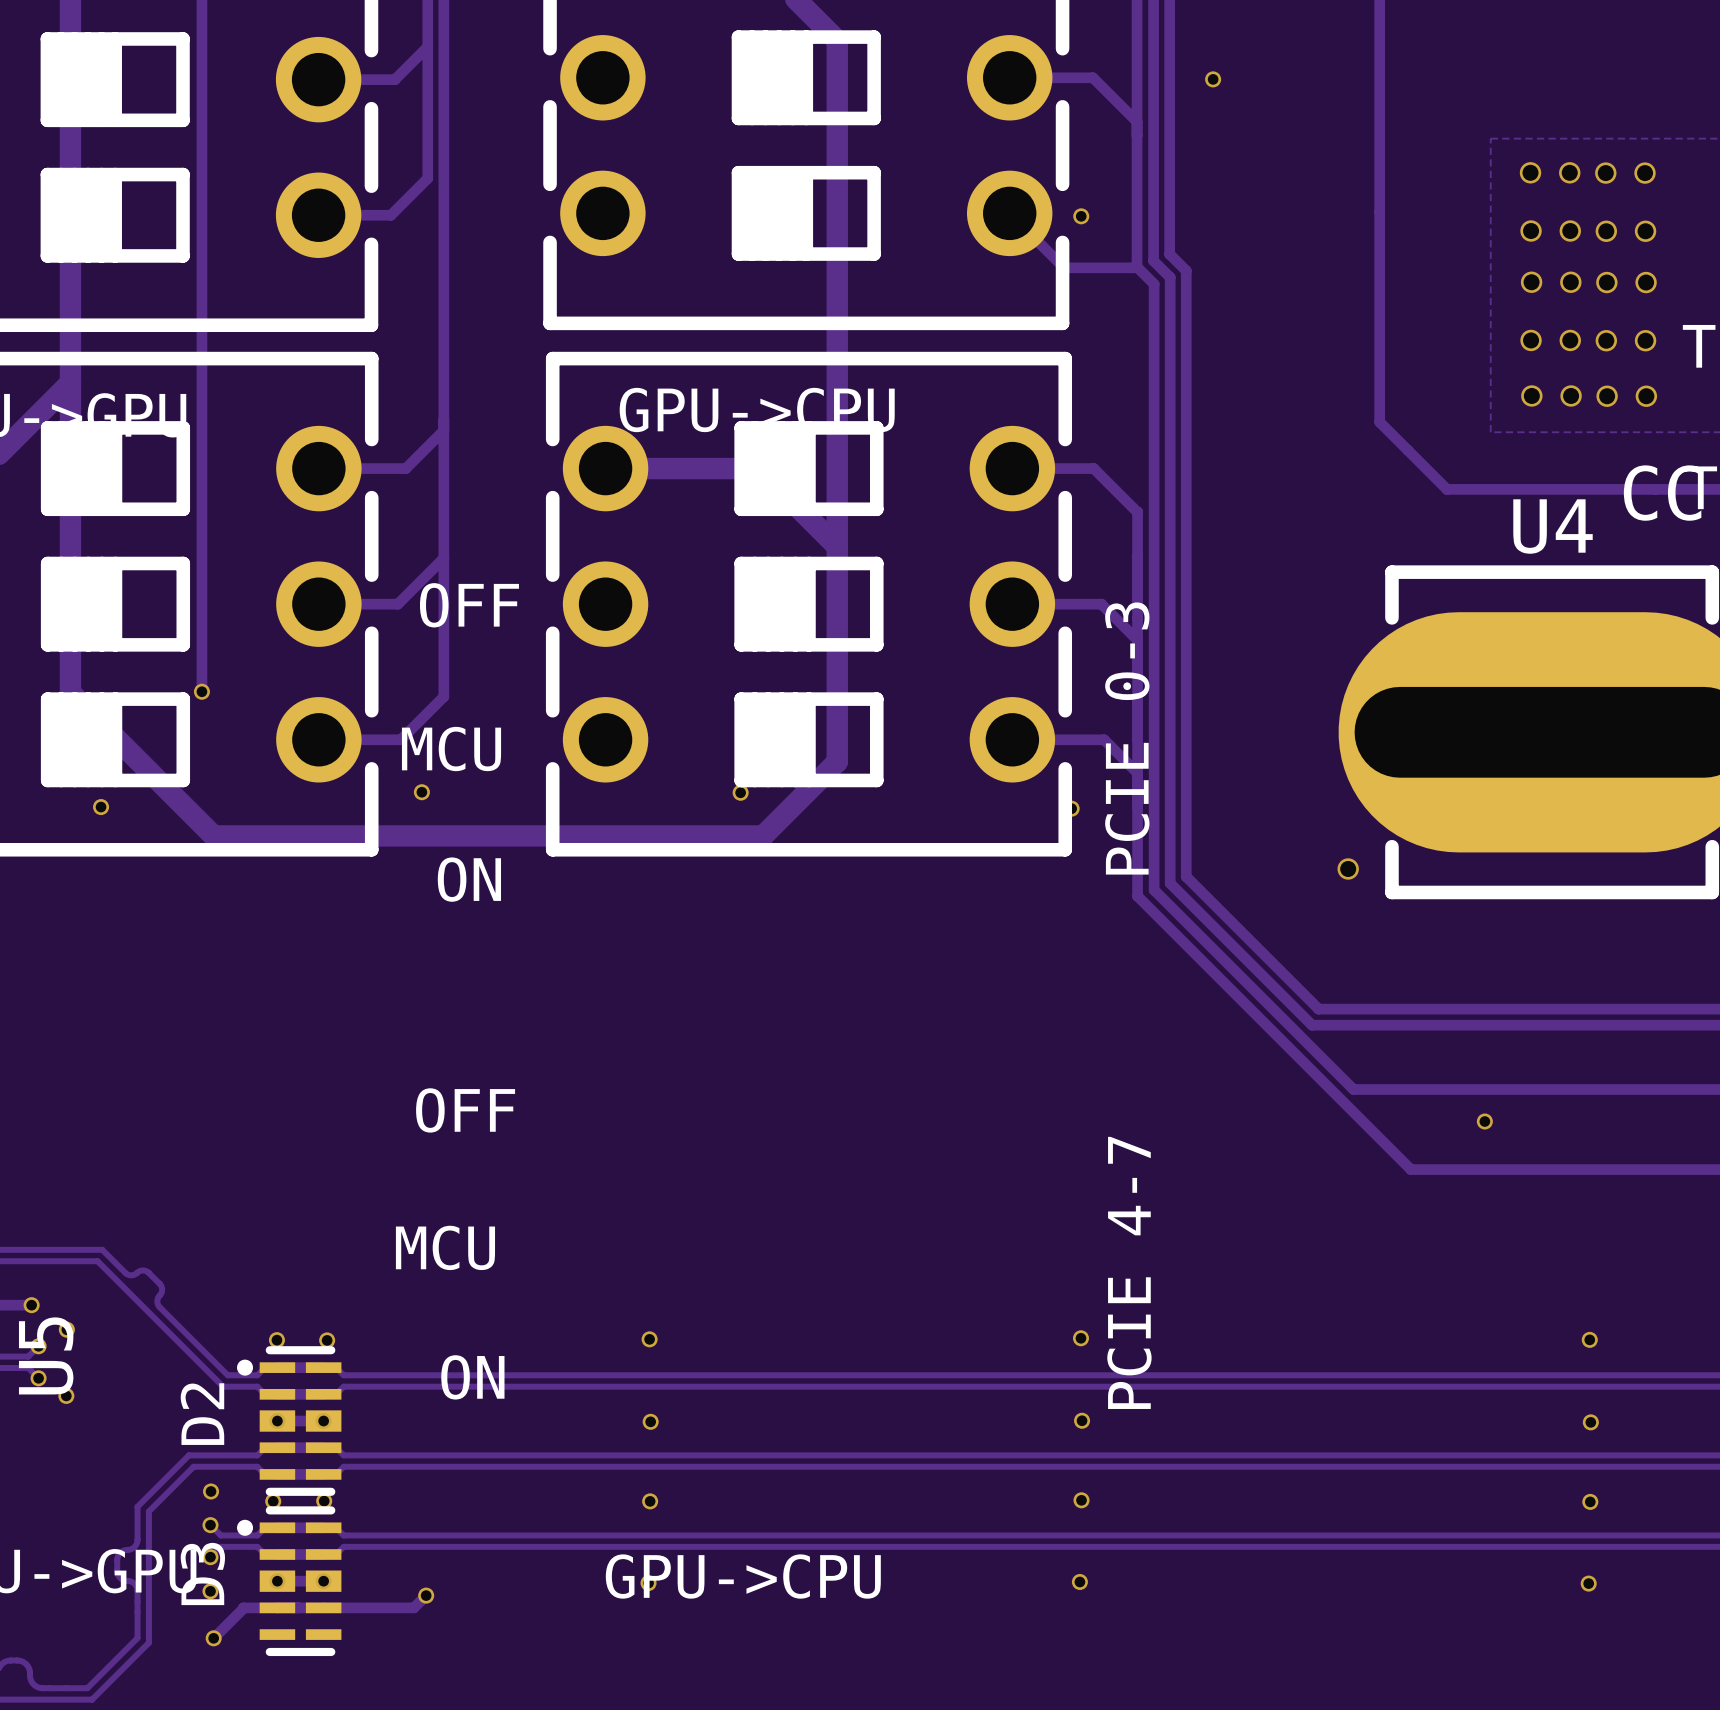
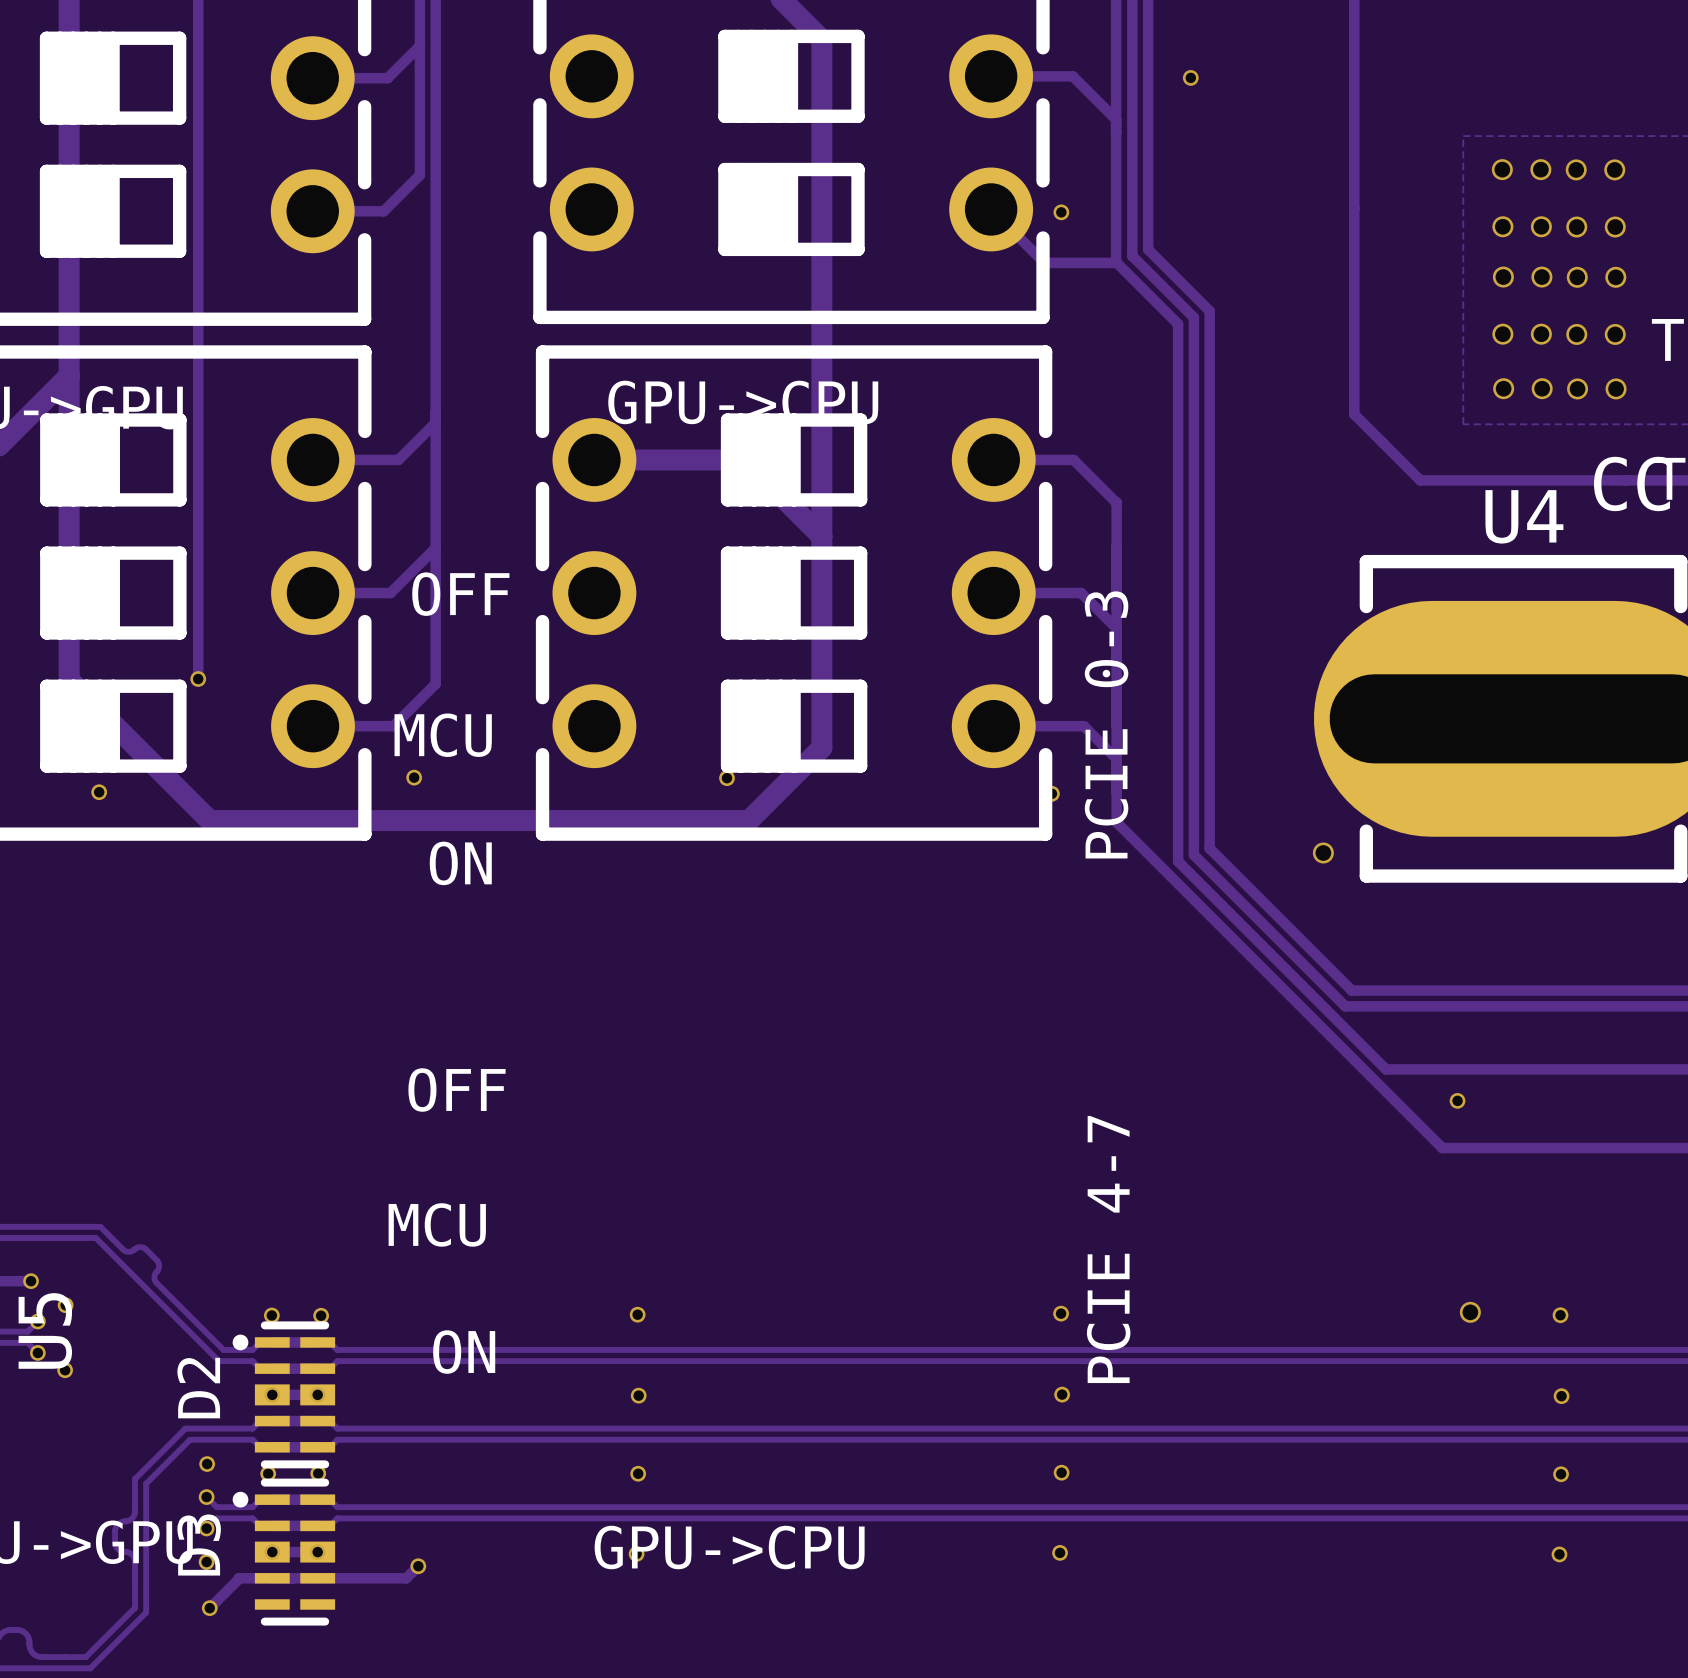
track: (1186, 270) (1186, 876) (1318, 1009) (1377, 1009) -> (1164, 265) (1209, 311) (1209, 848) (1351, 990)
track: (1170, 277) (1170, 883) (1312, 1025) (1370, 1025) -> (1148, 272) (1193, 317) (1193, 854) (1345, 1006)
track: (1154, 284) (1154, 890) (1353, 1089) (1412, 1089) -> (1132, 278) (1178, 324) (1178, 861) (1386, 1069)
track: (1137, 837) (1137, 896) (1410, 1169) (1469, 1169) -> (1116, 822) (1442, 1148)
via: none -> (1470, 1312)

